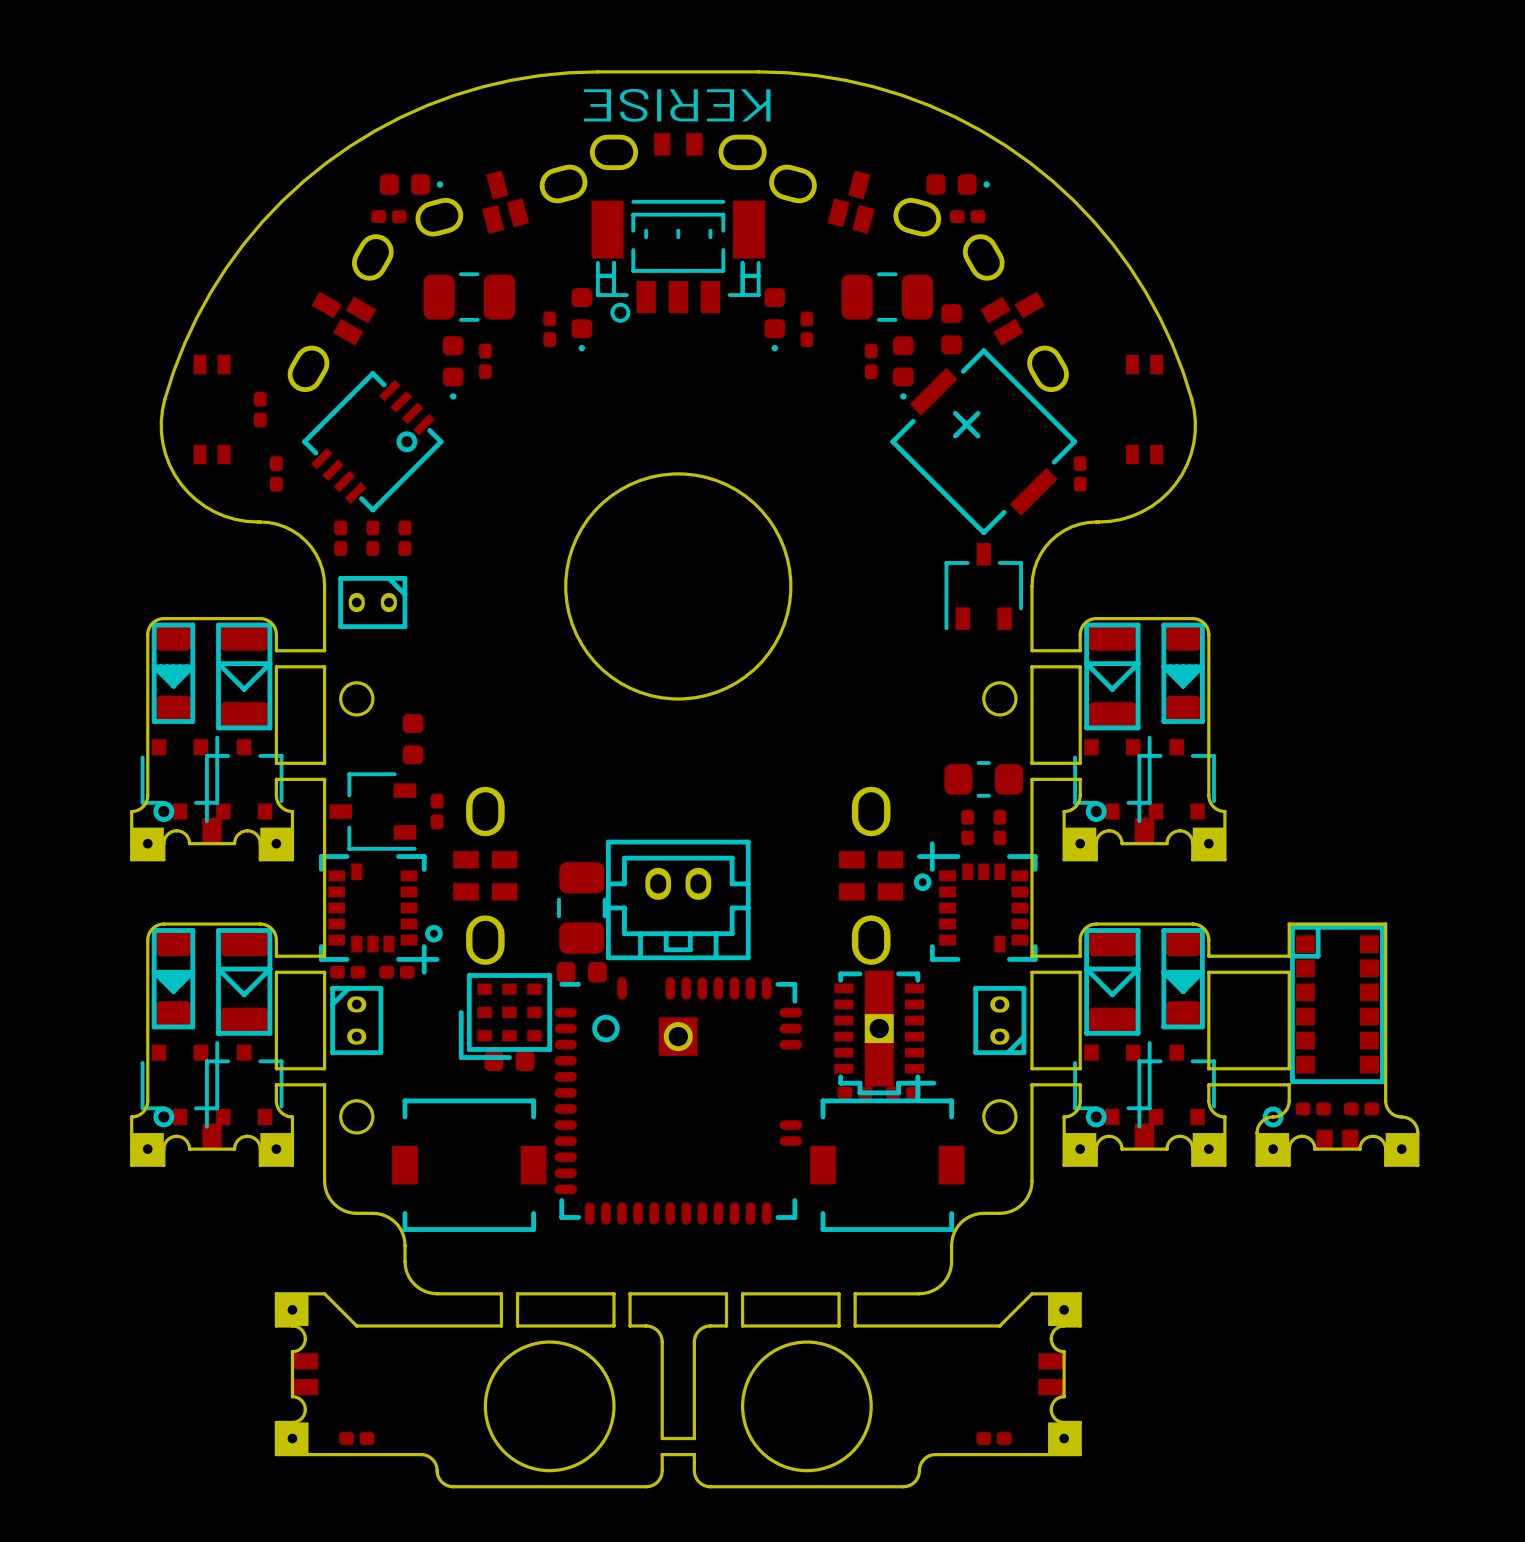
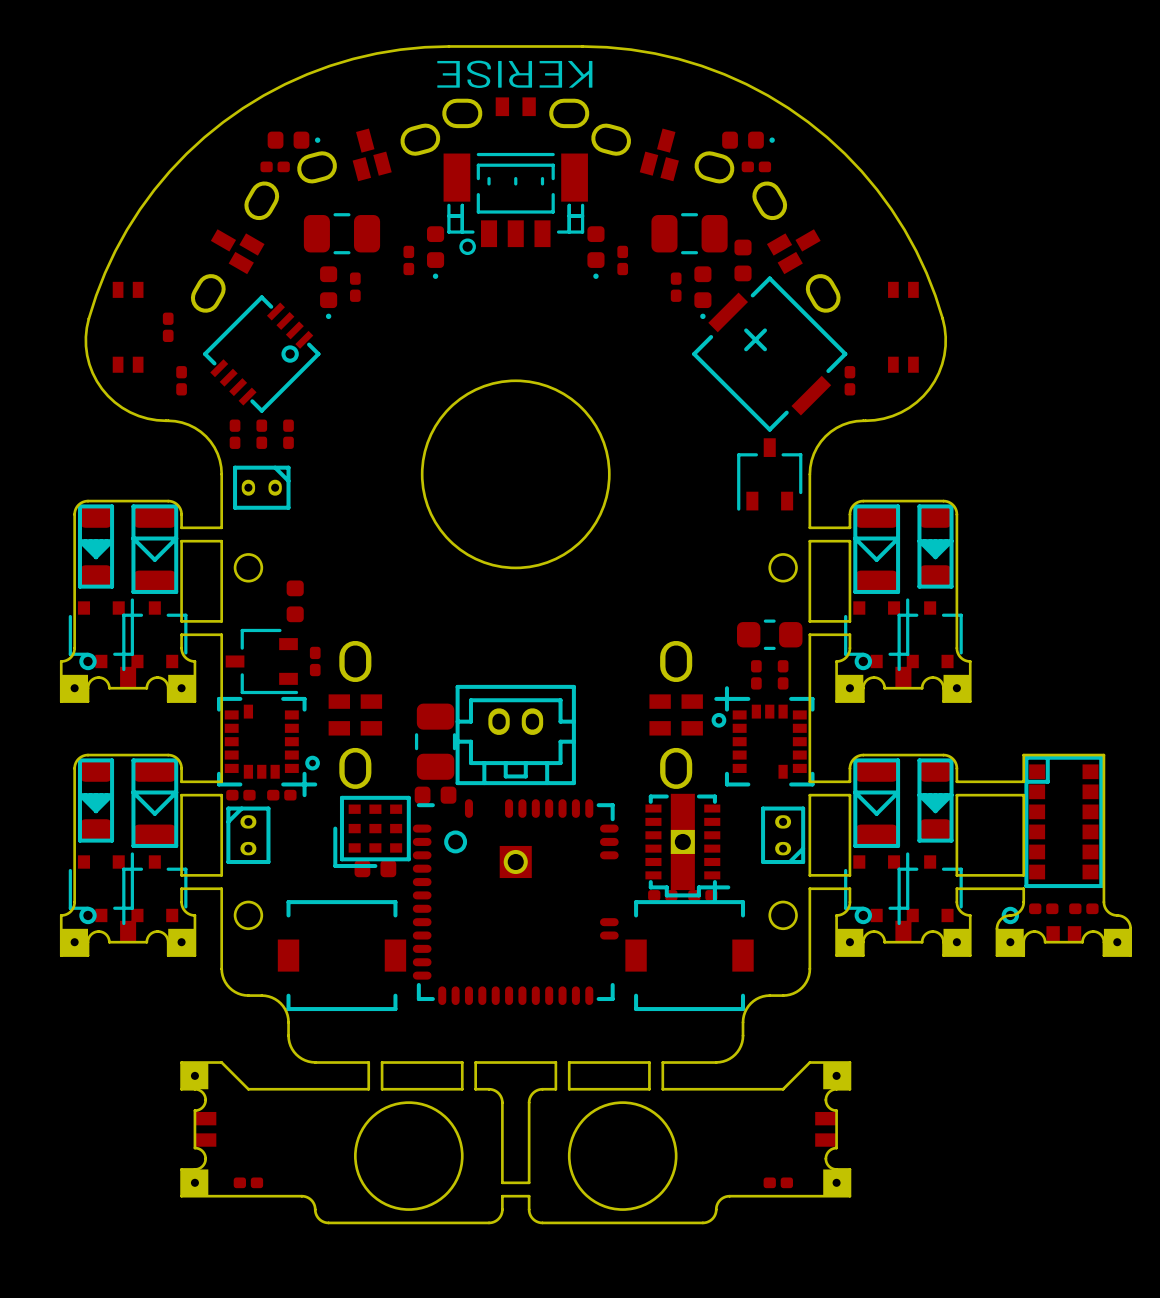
part footprint: [554, 977, 803, 1225] -> [412, 799, 619, 1006]

